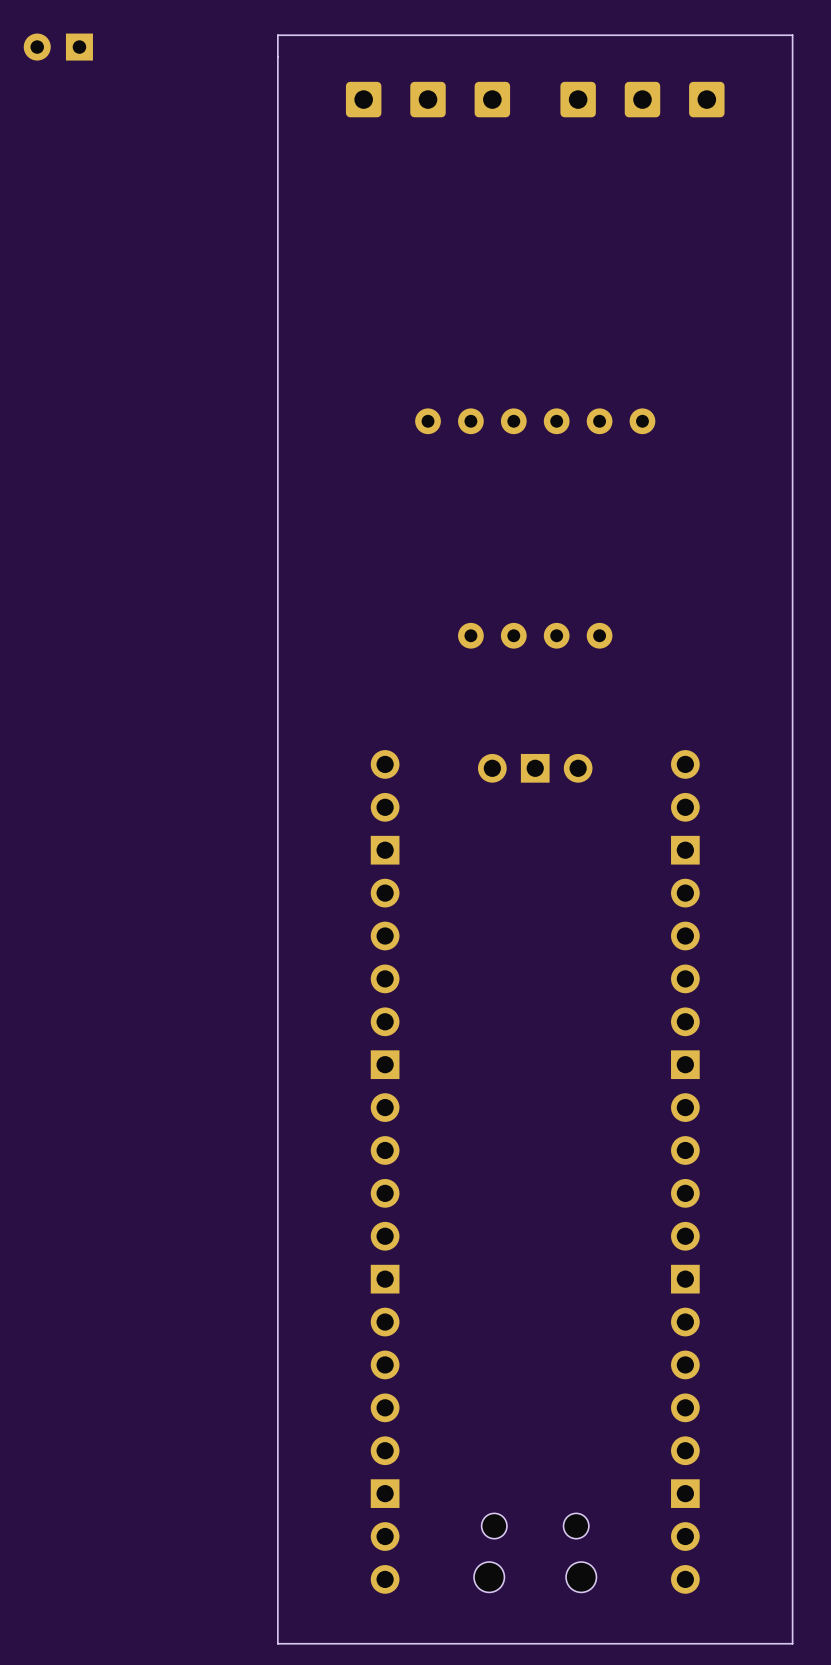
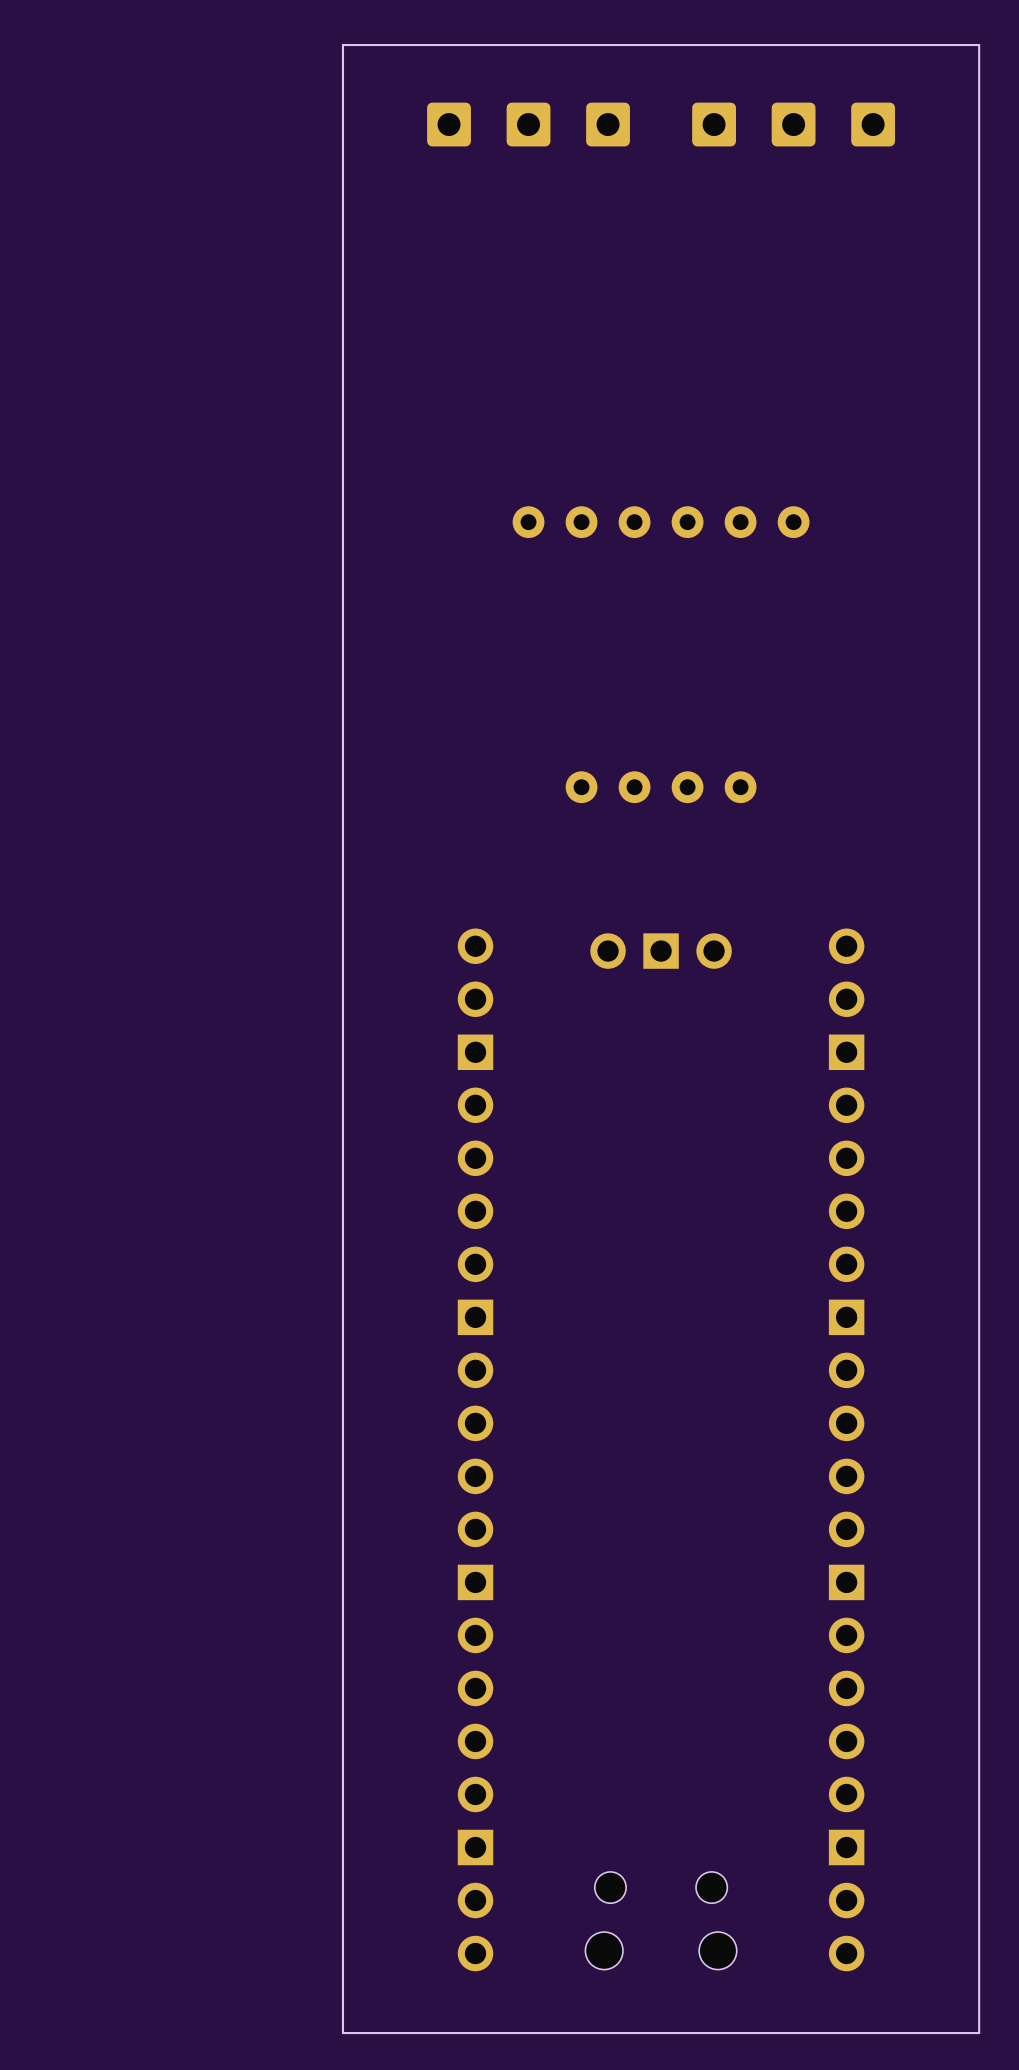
part: (58, 47) -> none

